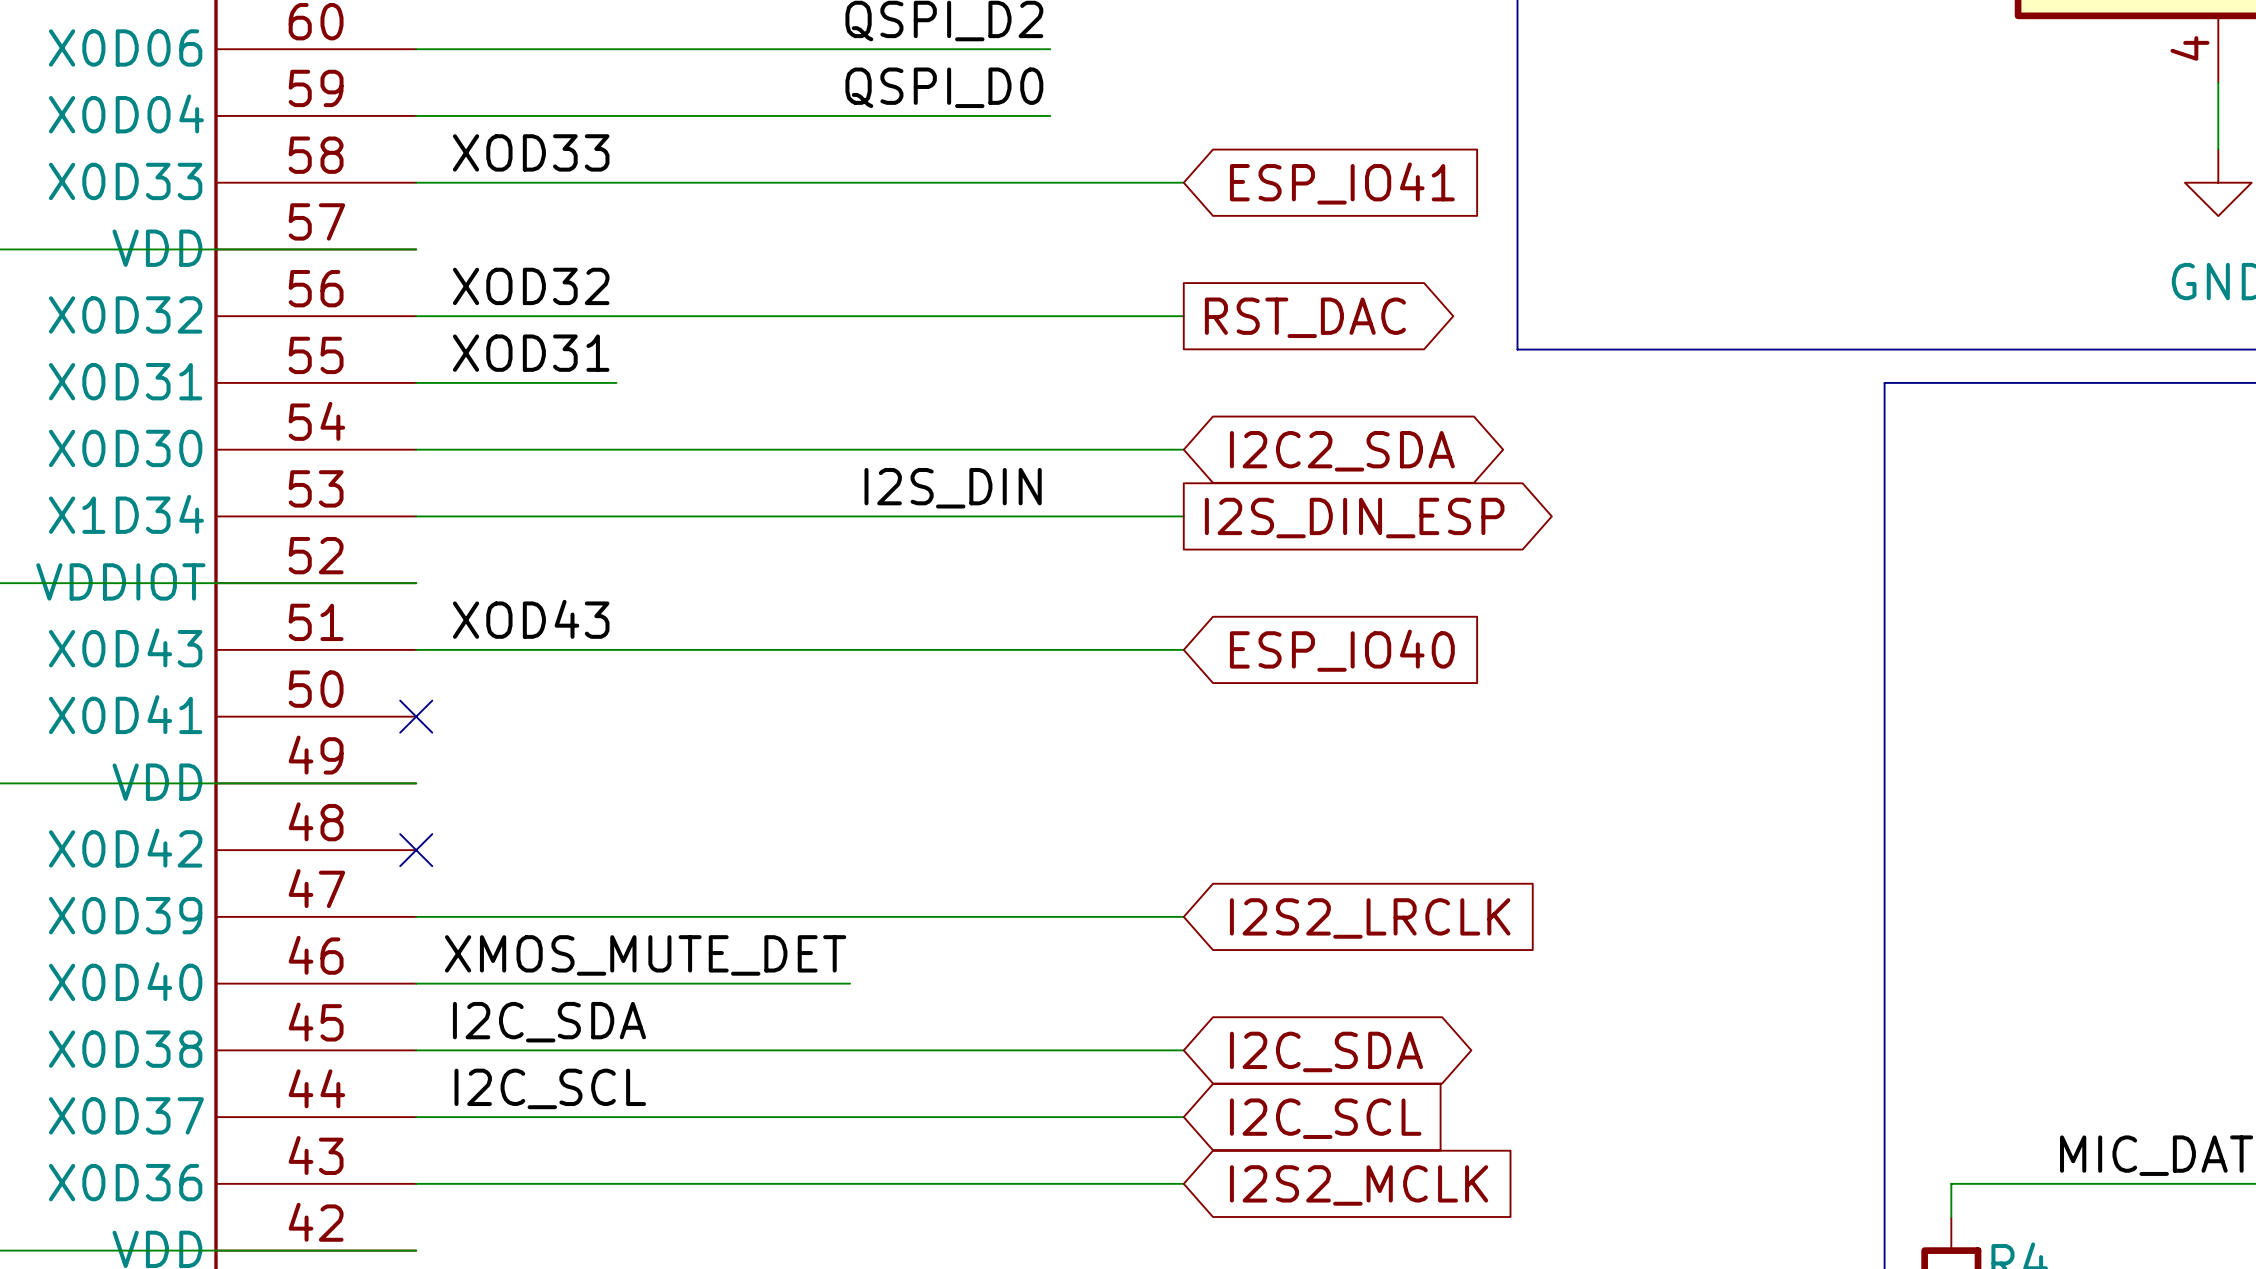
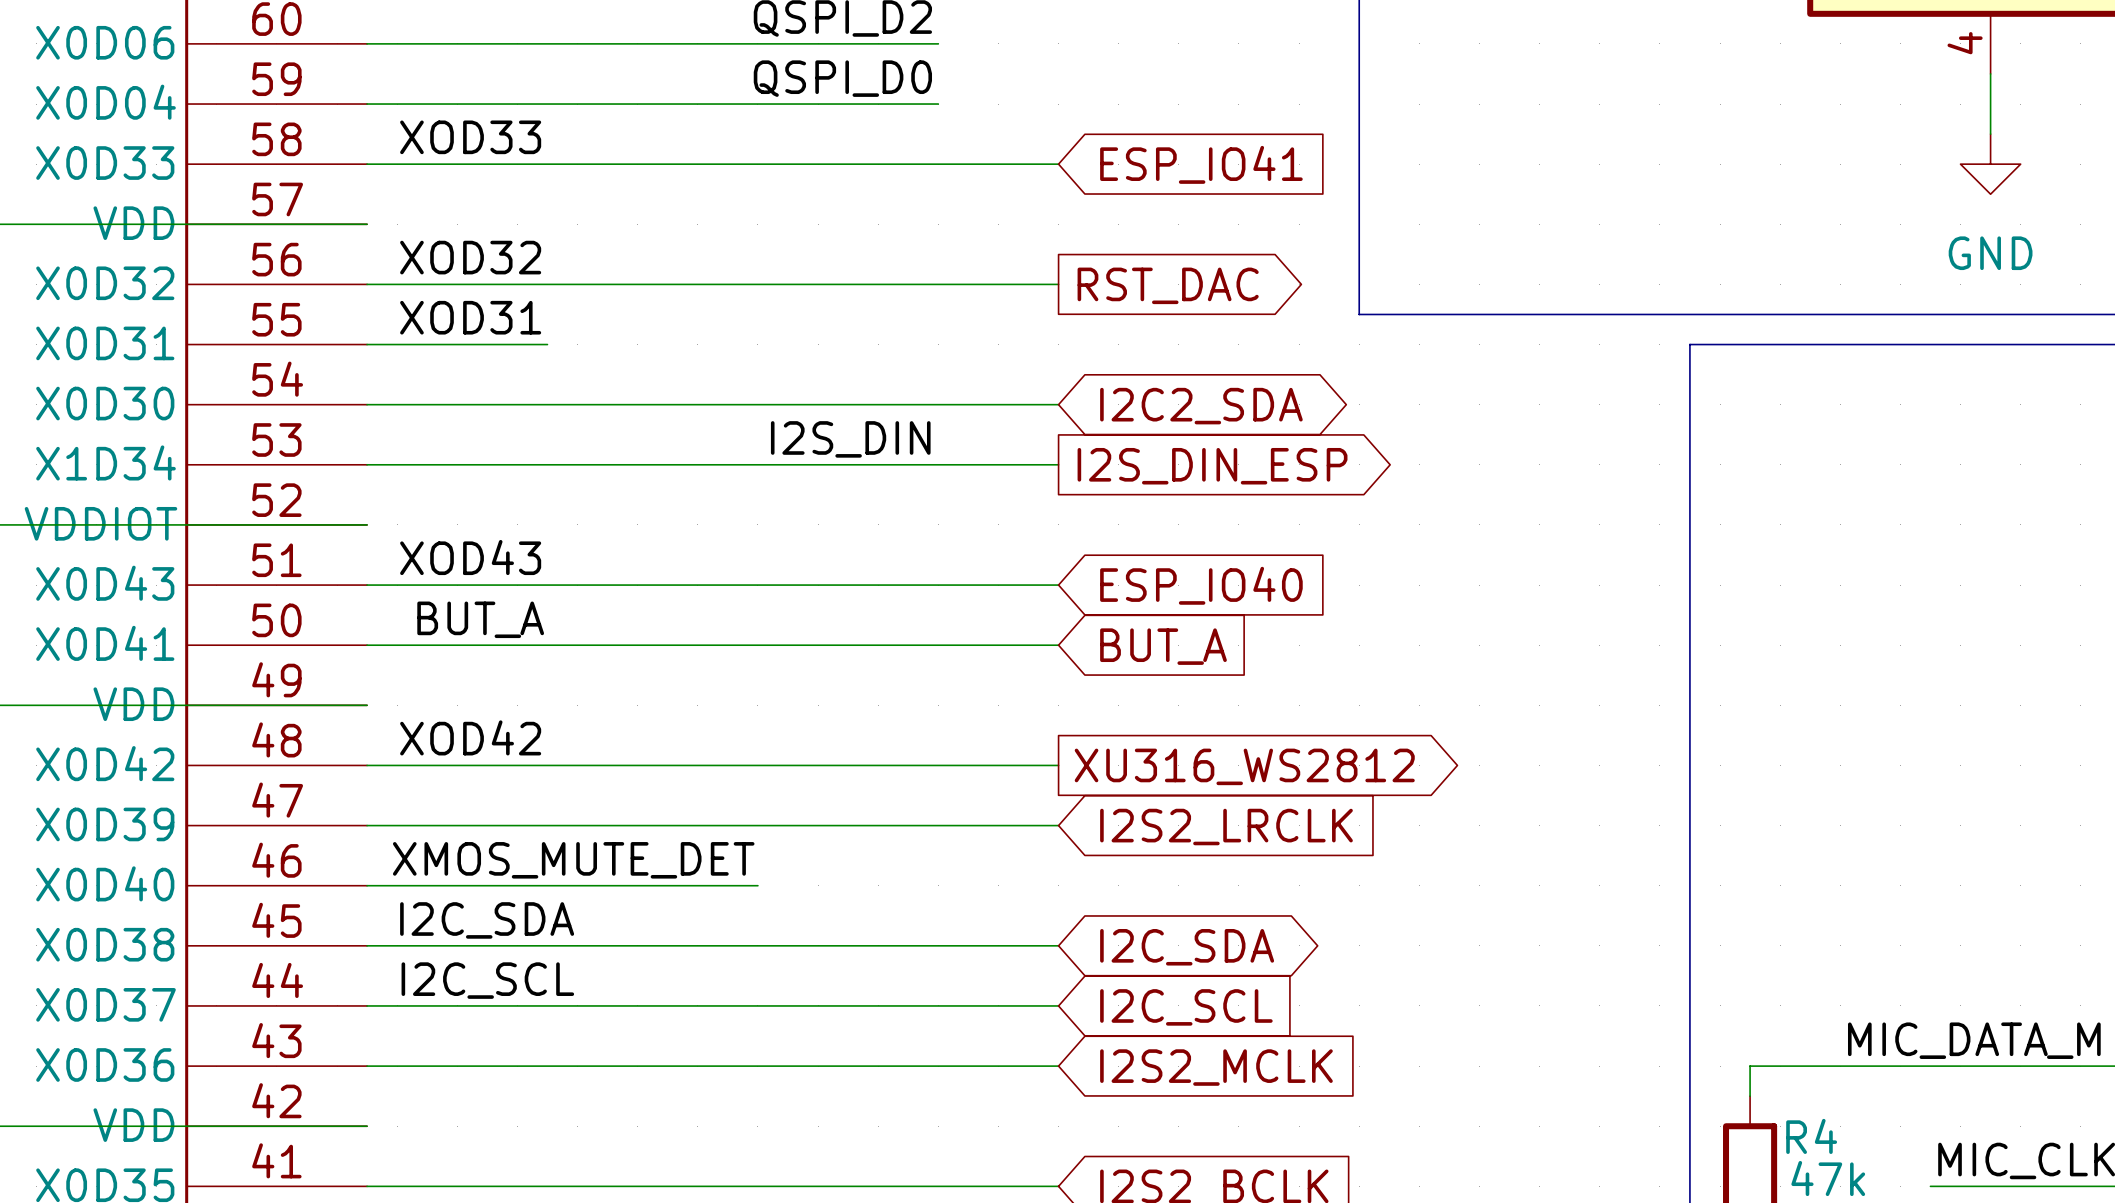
label: none -> BUT_A (480, 619)
wire: none -> (367, 645) (1058, 645)
no-connect mark: (416, 716) -> none
global label: none -> BUT_A (1163, 646)
label: none -> XOD42 (470, 737)
wire: none -> (367, 765) (1058, 765)
no-connect mark: (416, 850) -> none
global label: none -> XU316_WS2812 (1244, 766)

